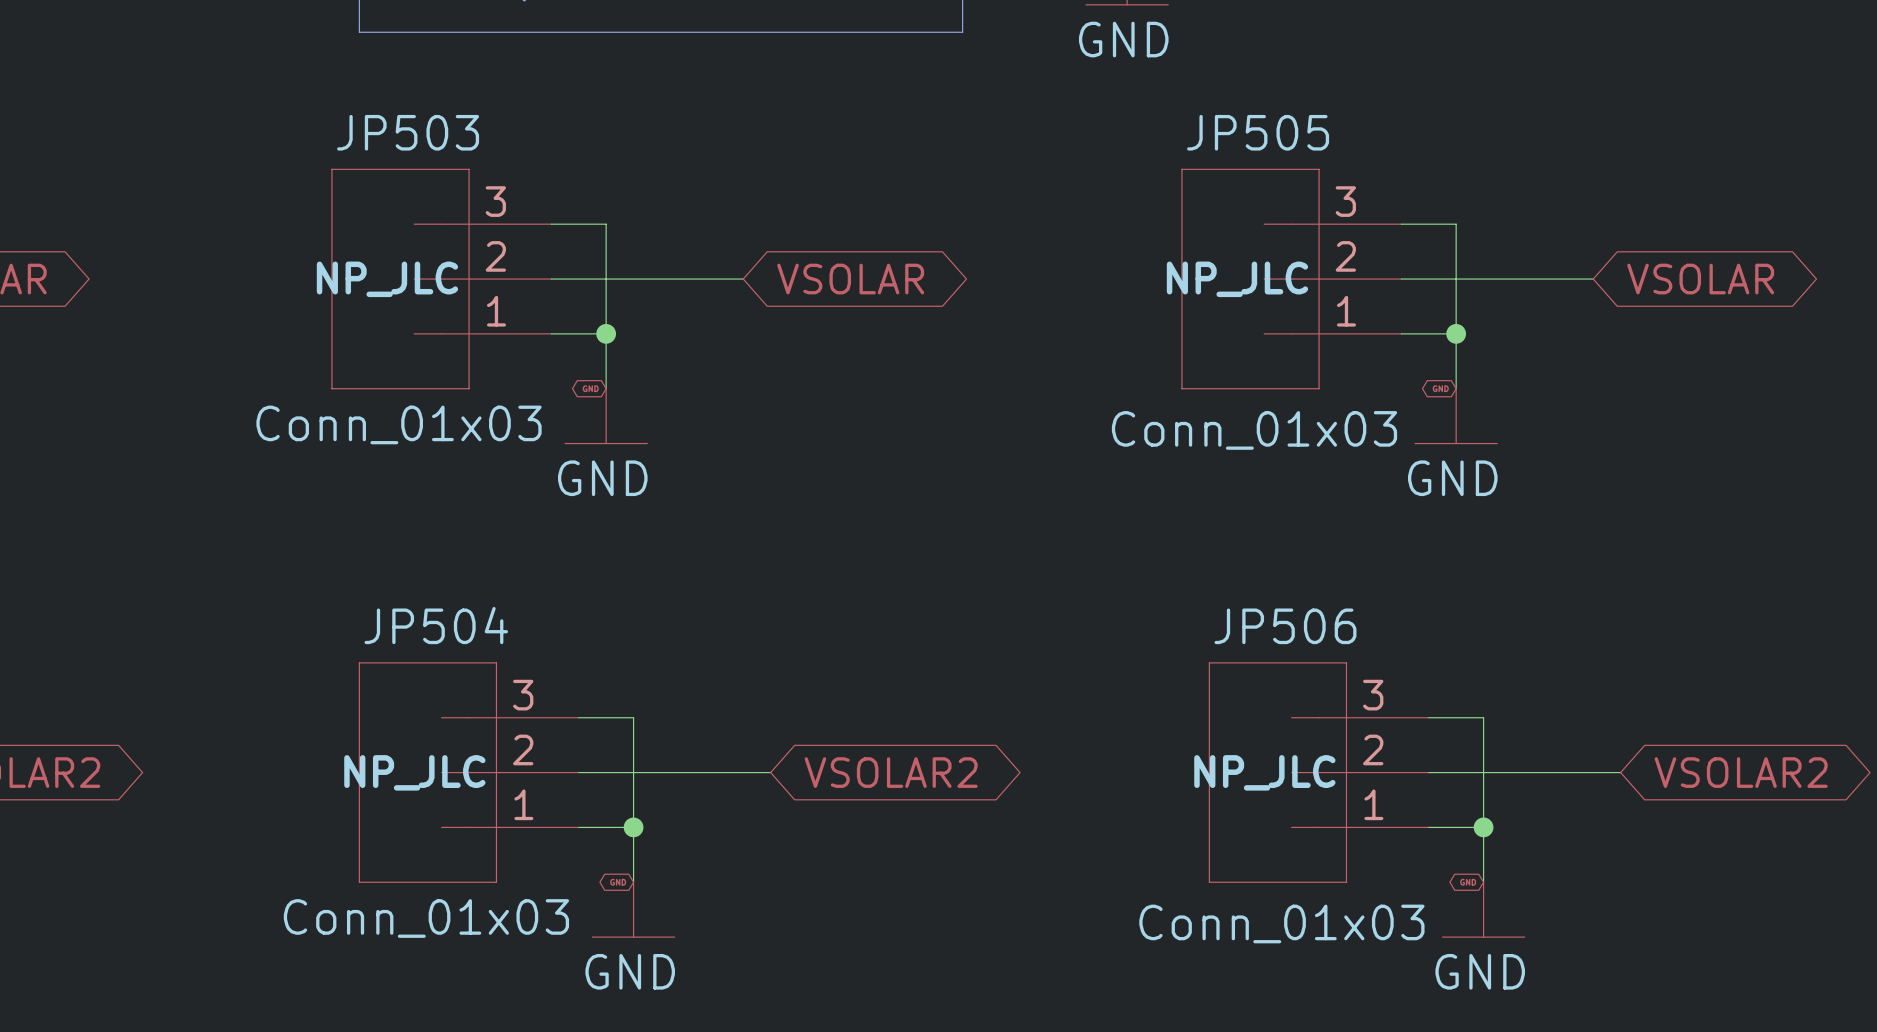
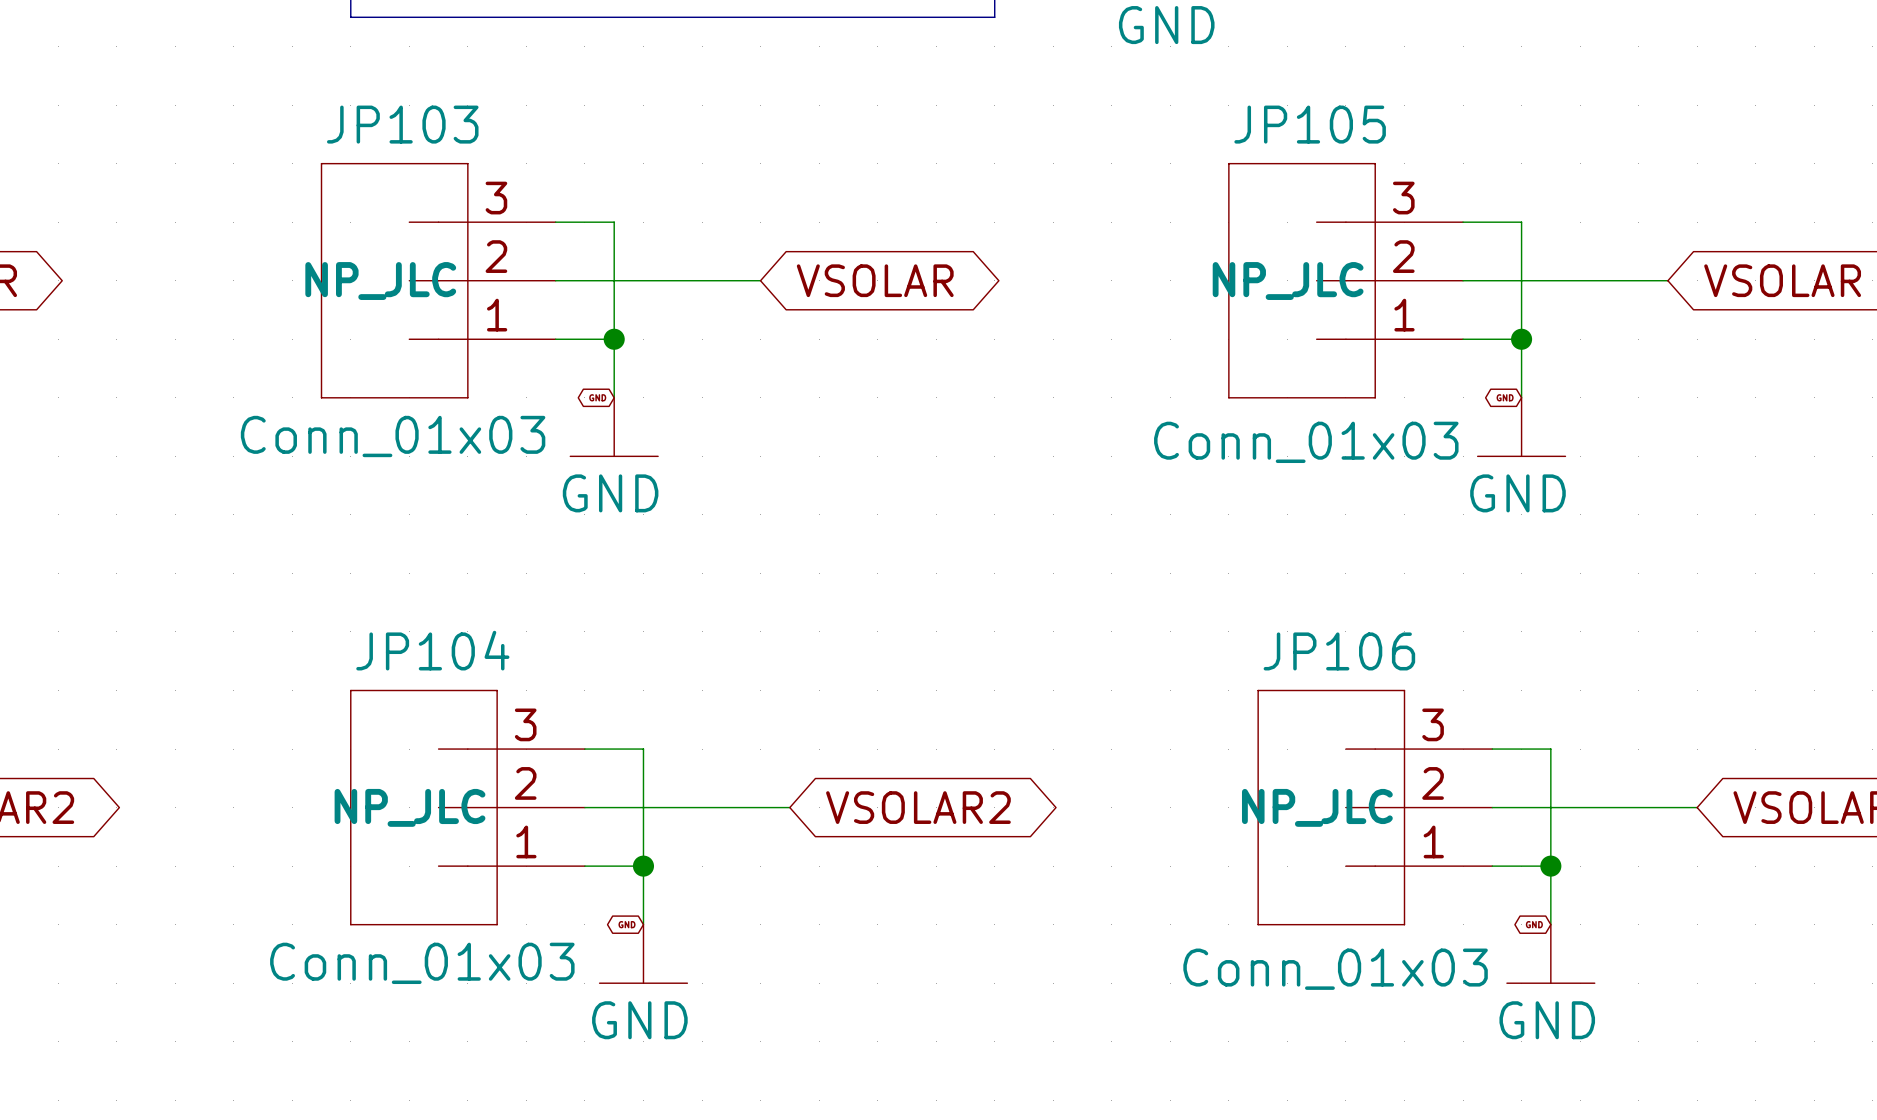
JP503 name: JP503 (408, 132) -> JP103 (402, 124)
JP505 name: JP505 (1258, 132) -> JP105 (1310, 124)
JP504 name: JP504 (436, 625) -> JP104 (432, 650)
JP506 name: JP506 (1285, 626) -> JP106 (1339, 651)

